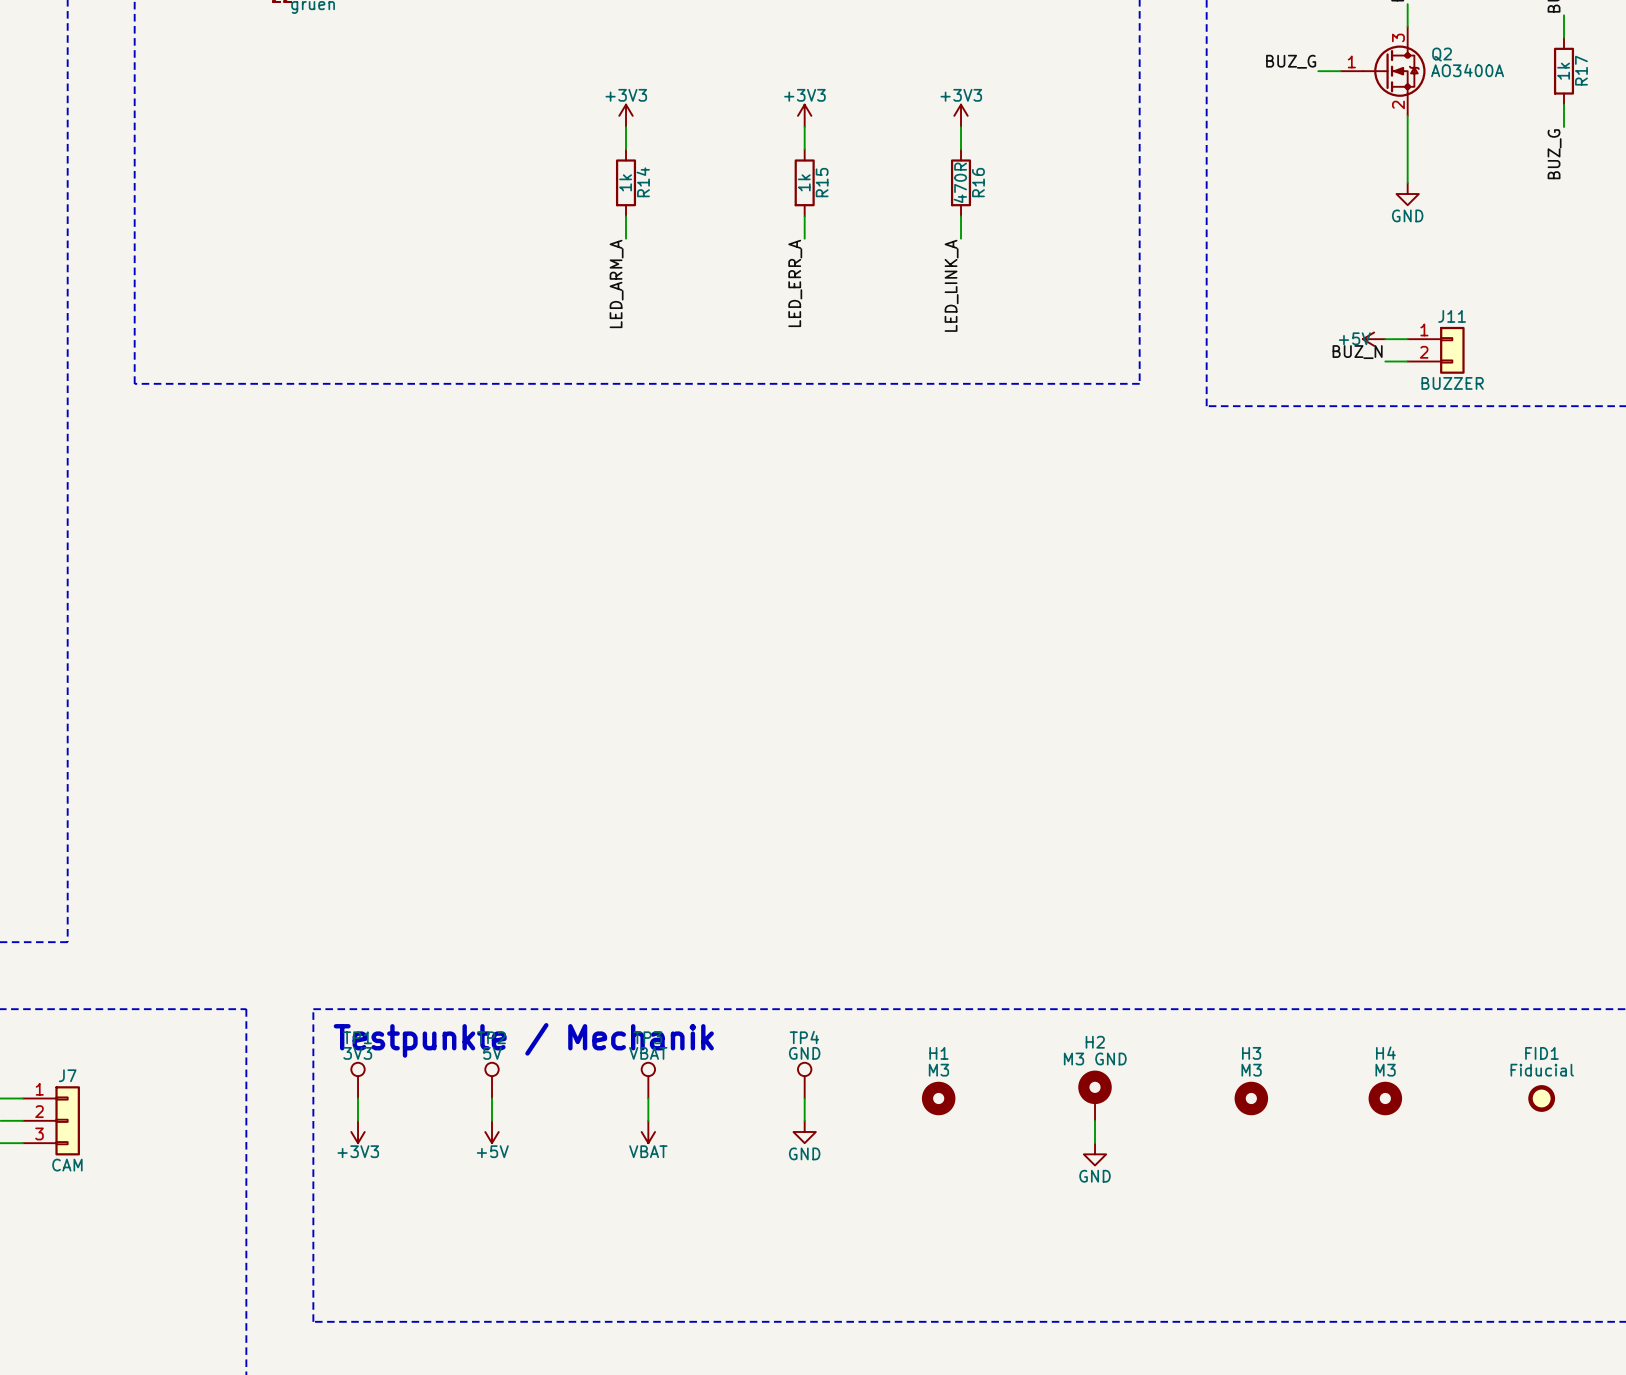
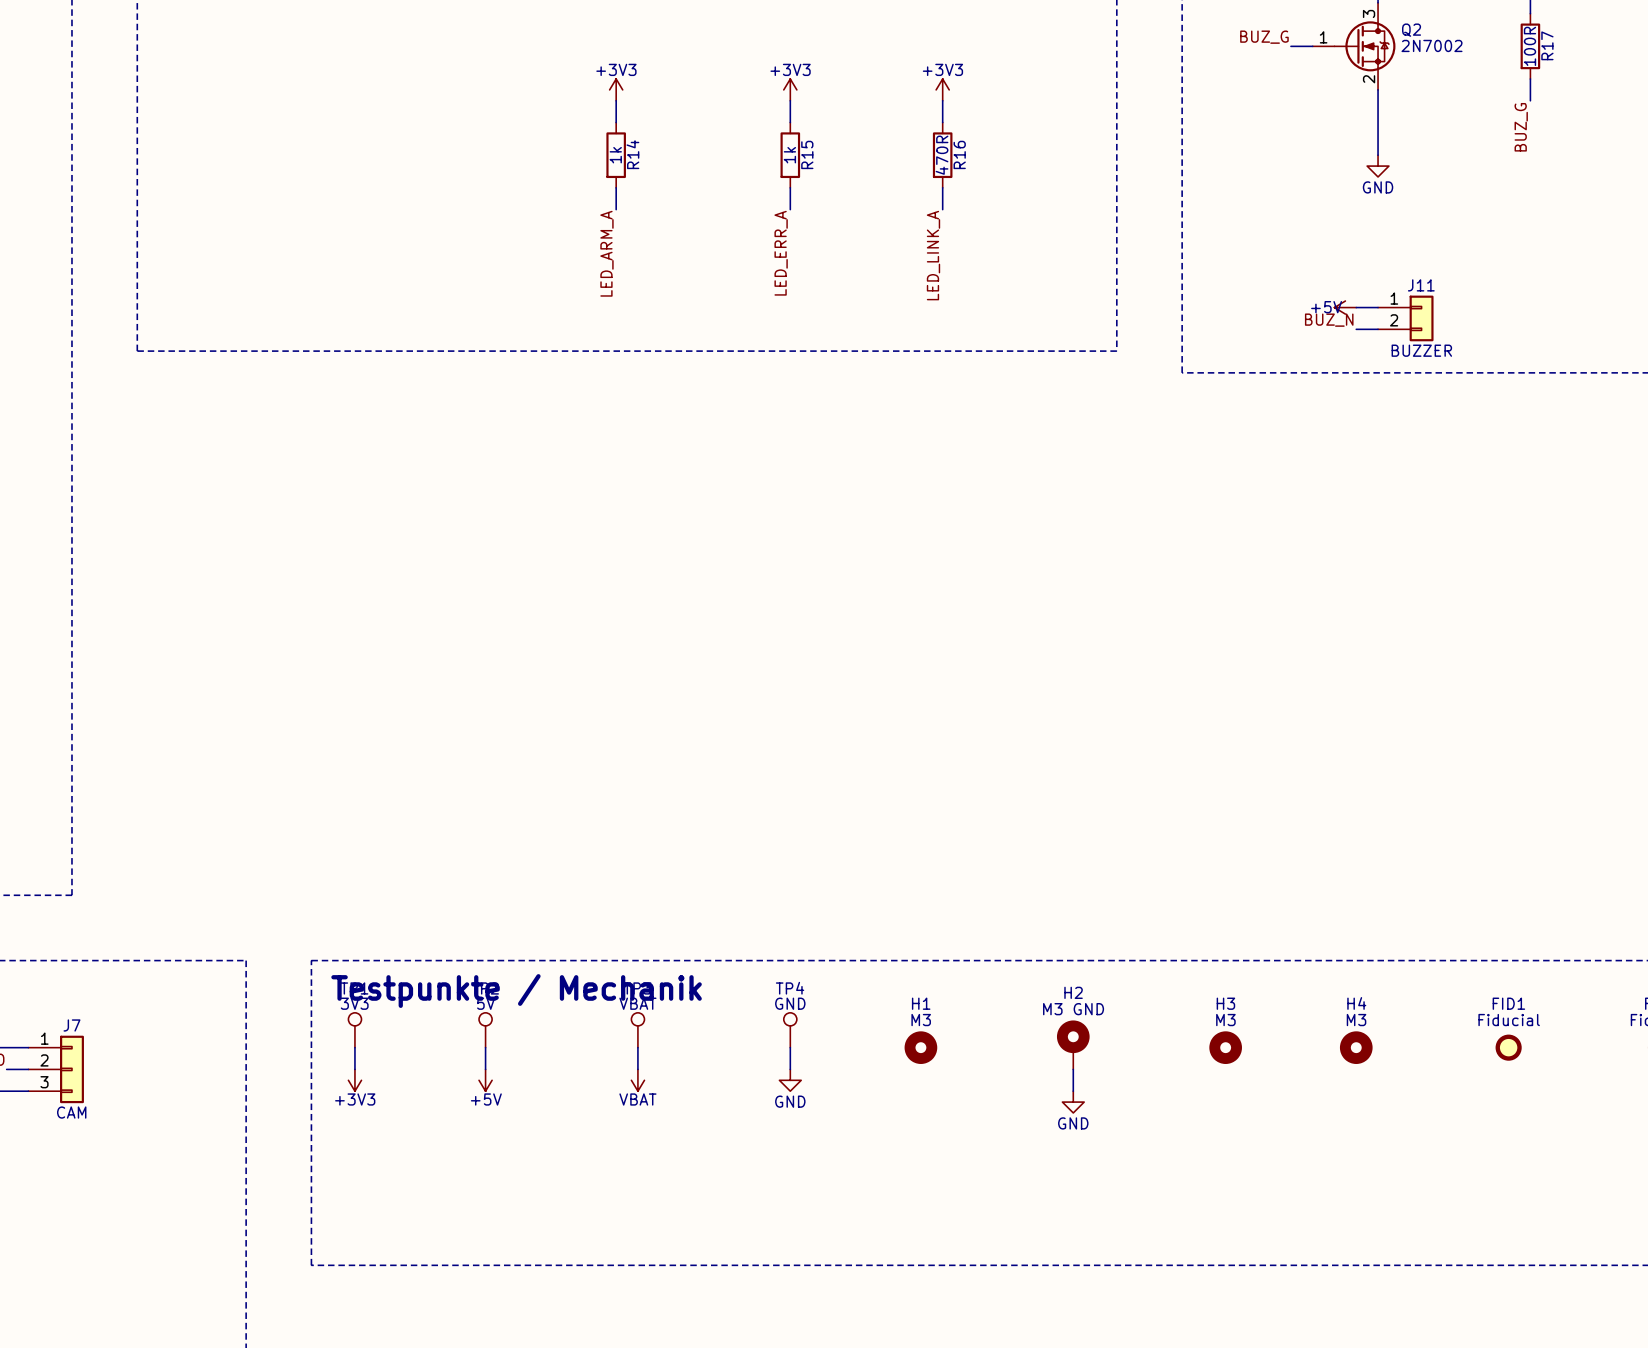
Q2 value: AO3400A (1467, 70) -> 2N7002 (1432, 45)
R17 value: 1k (1563, 71) -> 100R (1530, 46)

